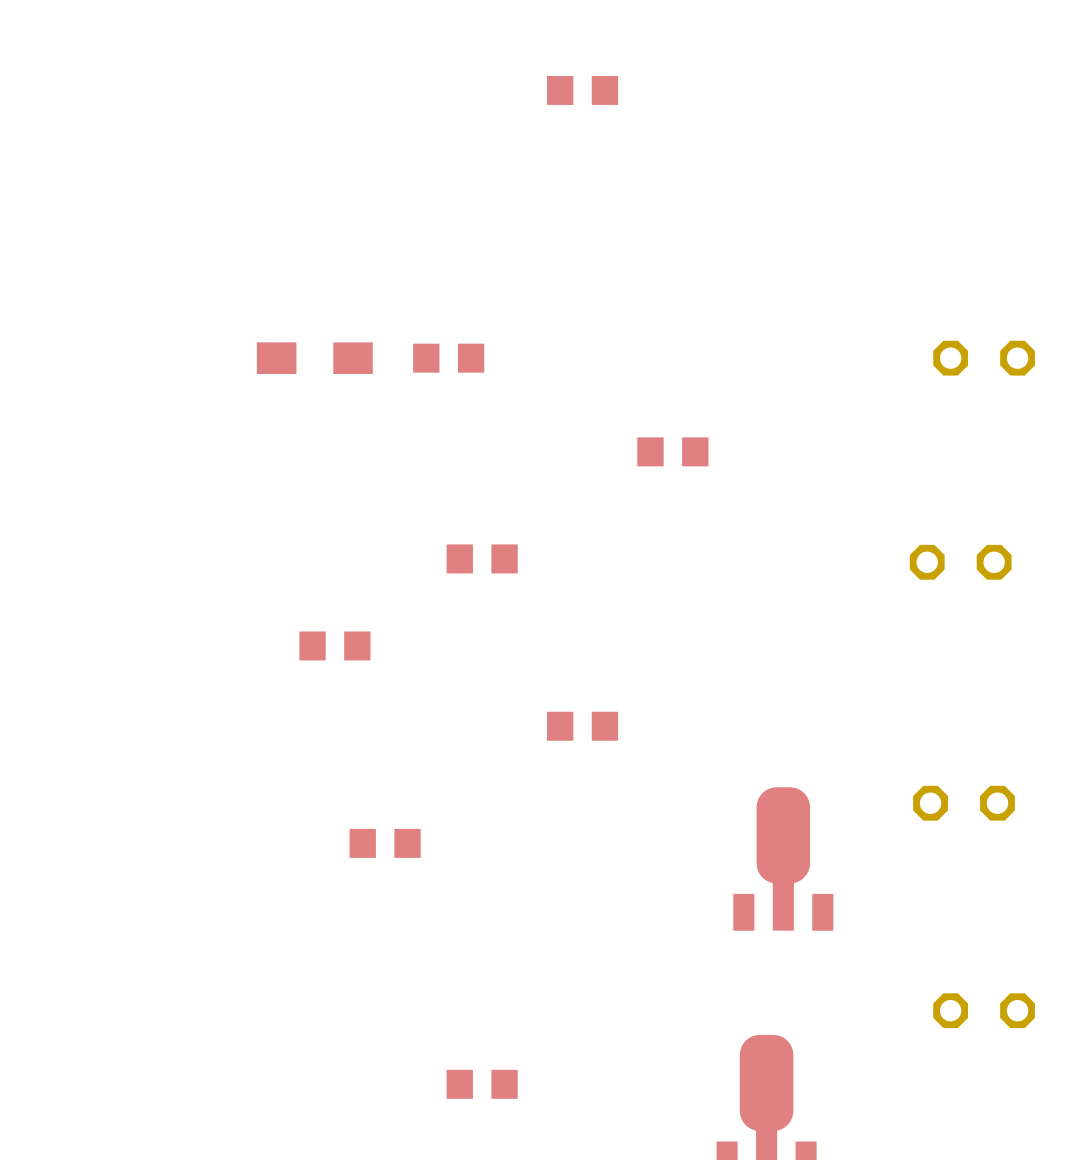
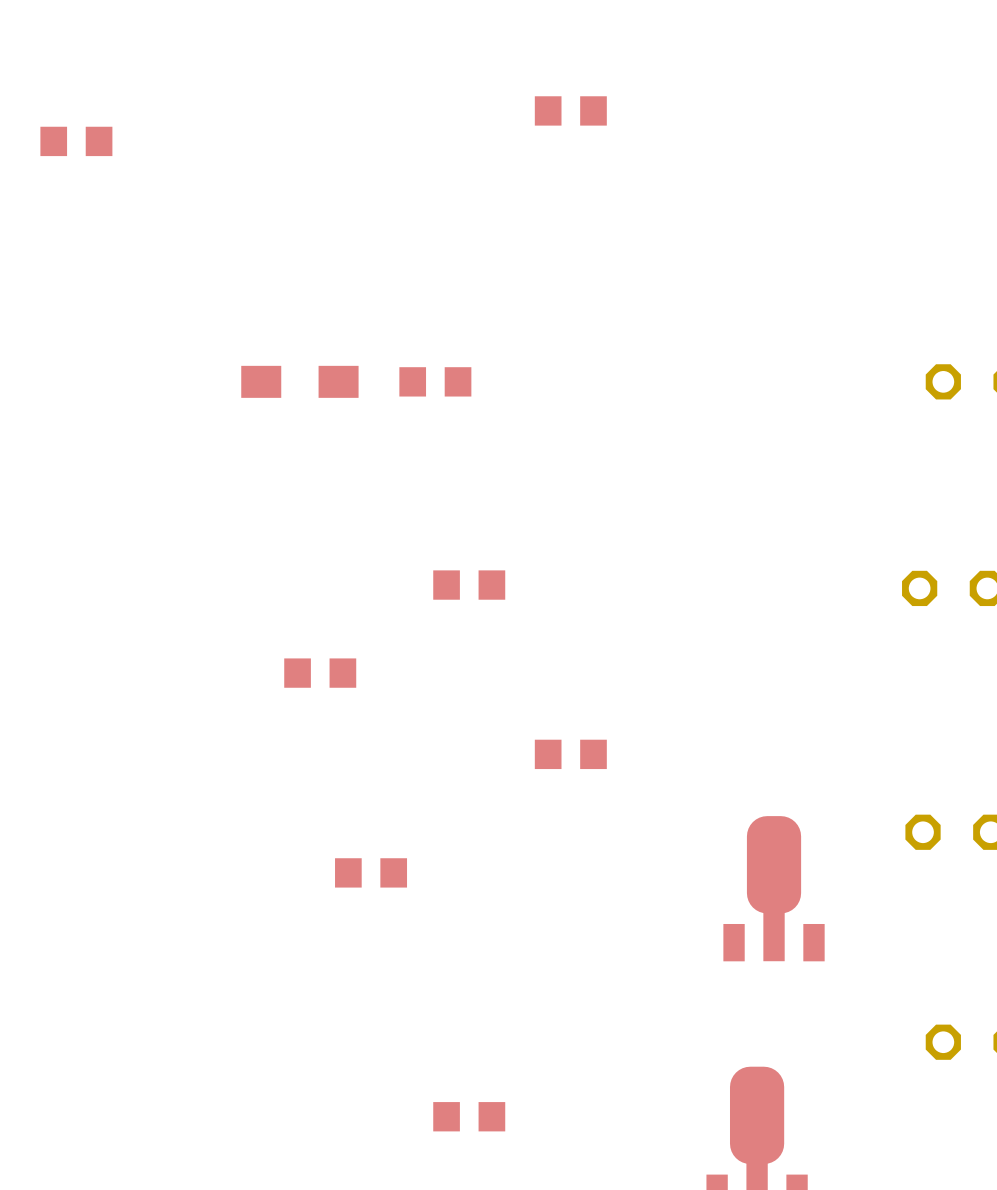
part: none -> (76, 141)
part: (672, 451) -> none

